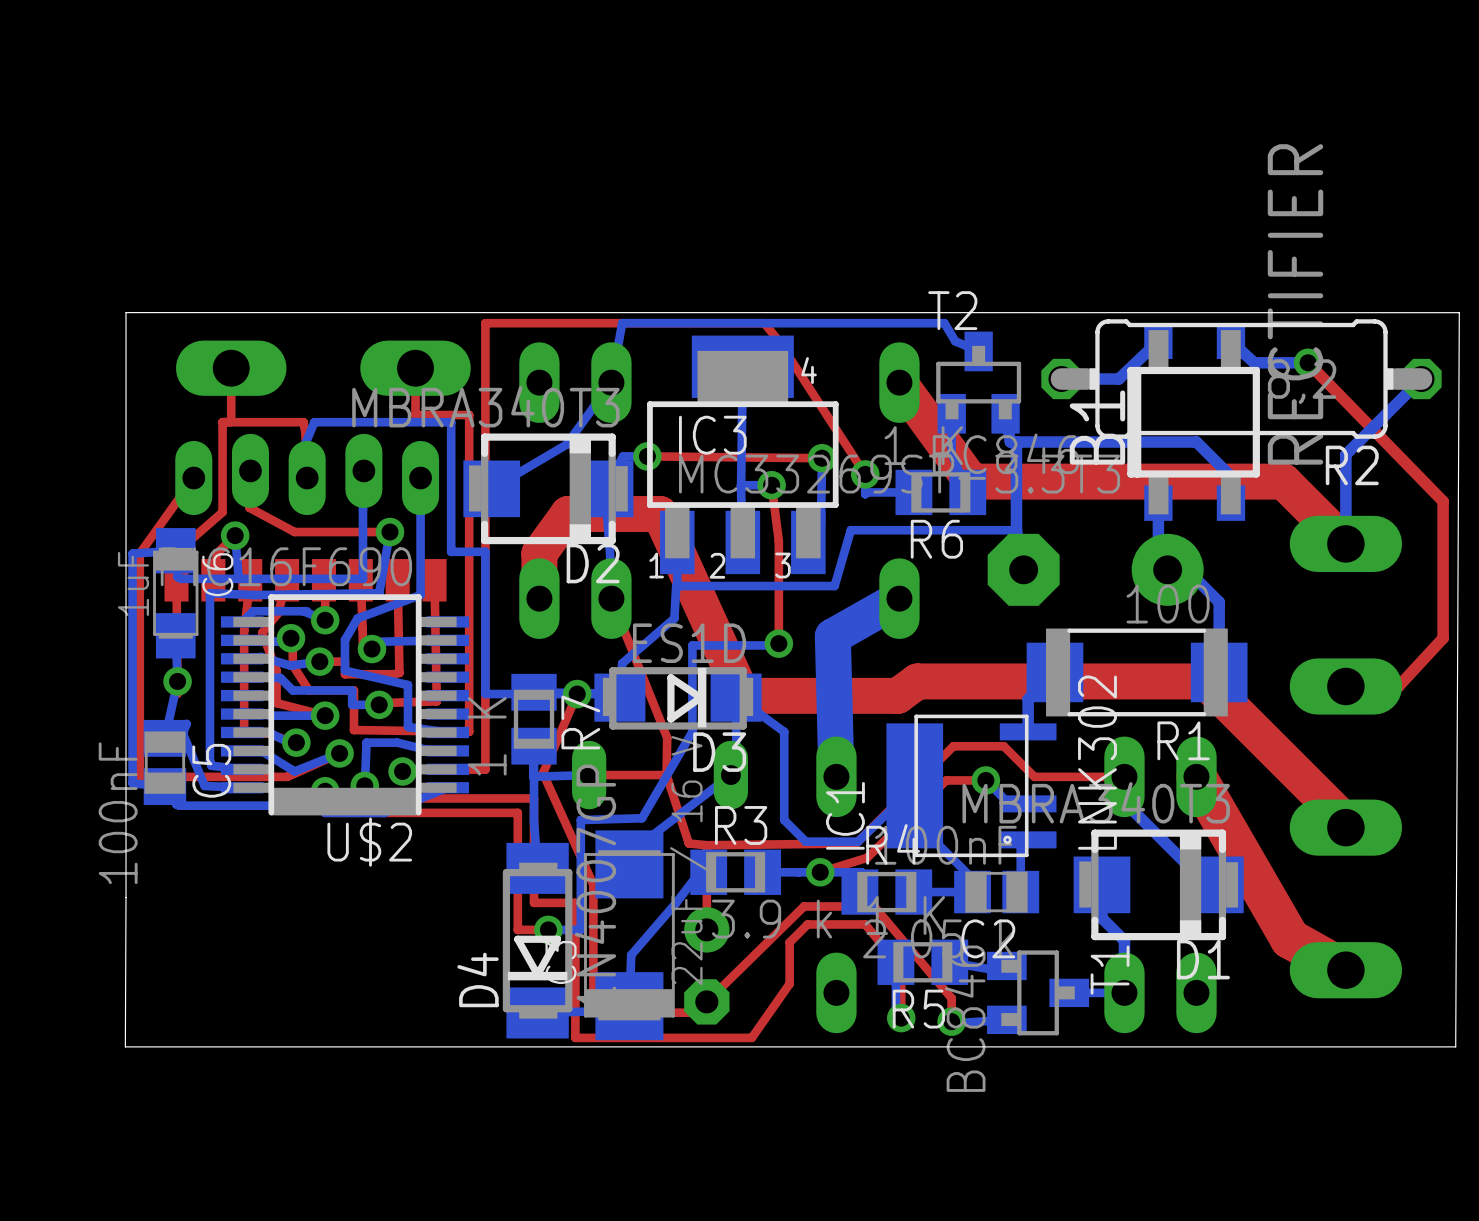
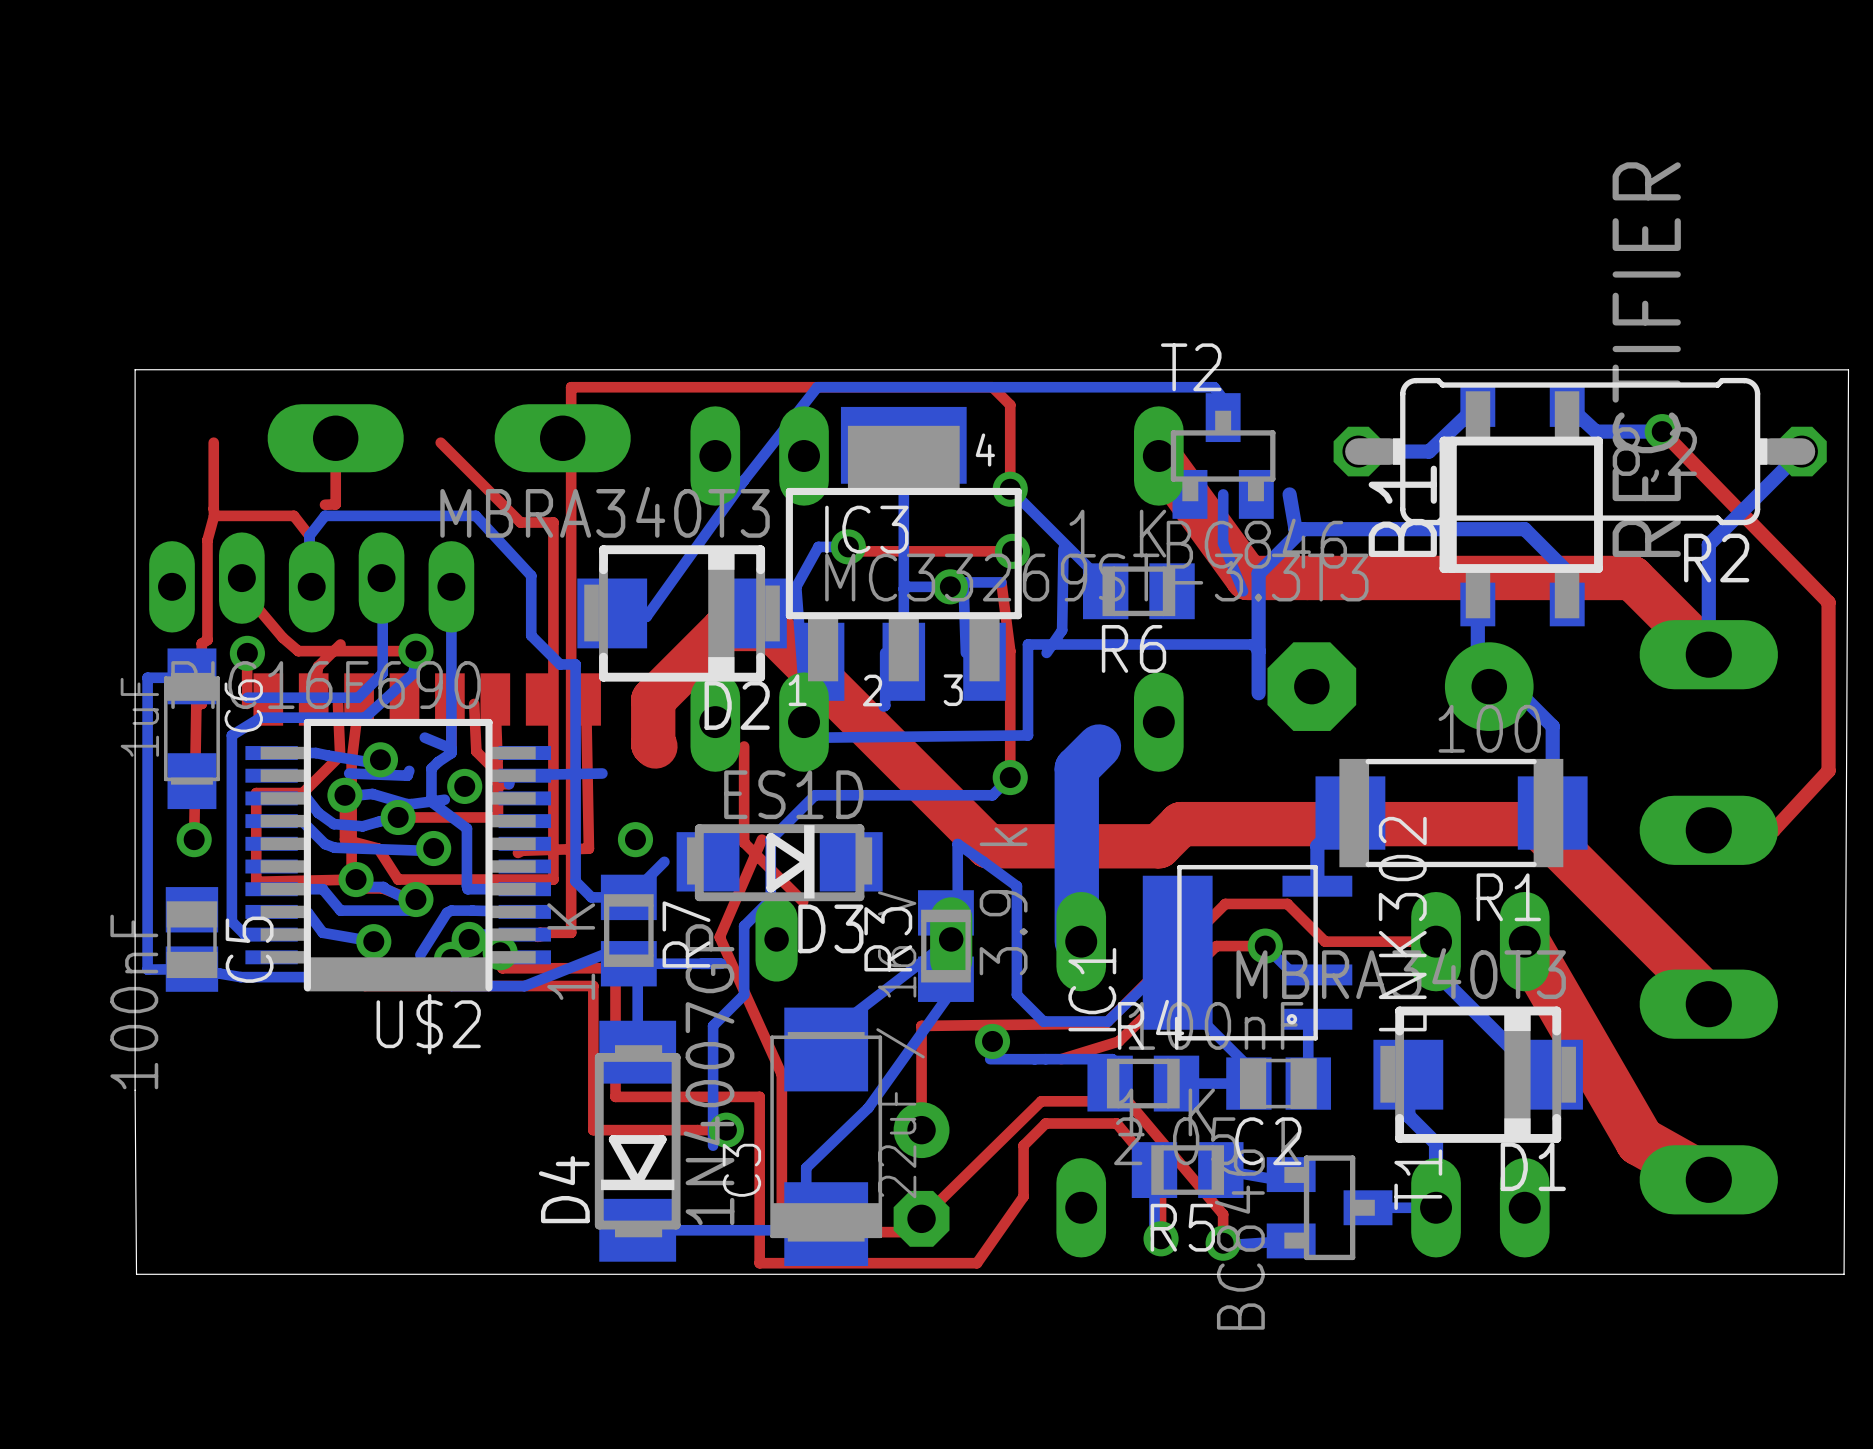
board edge: (126, 312) (125, 1046) -> (206, 369) (135, 369) (136, 1274) (205, 1274)
bottom track: none -> (1223, 417) (1227, 404) (1214, 387) (817, 387) (744, 480) (646, 616) (612, 613)
bottom track: (978, 351) (955, 341) (944, 323) (622, 323) (611, 382) (566, 444) (491, 488) -> none
bottom track: (742, 366) (741, 490) -> none
top track: (415, 368) (415, 415) (469, 415) (469, 731) (353, 730) (353, 690) (308, 690) (292, 665) (290, 638) -> none
top track: none -> (213, 442) (214, 515)
top track: none -> (440, 442) (520, 522) (553, 522) (553, 879) (398, 879) (378, 848) (344, 839) (344, 795)
bottom track: none -> (903, 445) (903, 661)
T2 position: (978, 382) -> (1223, 455)
bottom track: none -> (1010, 489) (1101, 580) (1101, 593) (1105, 591)
via: none -> (1010, 489)
top track: none -> (214, 515) (207, 540) (207, 640) (201, 643) (201, 703) (196, 703) (194, 839)
top track: none -> (214, 515) (293, 515) (309, 535) (309, 593) (311, 586)
bottom track: (1016, 442) (1016, 530) -> (1302, 529) (1258, 573) (1258, 693)
IC3 position: (742, 454) -> (903, 553)
top track: (647, 456) (822, 458) -> (848, 546) (852, 551) (1012, 551)
via: (822, 458) -> none
top track: (250, 470) (249, 507) (294, 532) (389, 532) -> none
bottom track: (363, 470) (362, 578) (249, 578) -> (381, 578) (382, 673) (358, 697)
part position: (307, 474) -> (311, 582)
bottom track: (865, 474) (865, 494) (867, 492) (913, 492) -> none
top track: (865, 474) (778, 341) (764, 323) (485, 323) (485, 769) (422, 769) -> (1010, 489) (1010, 404) (992, 387) (571, 387) (571, 932)
via: (865, 474) -> none
top track: (193, 478) (139, 553) (139, 776) (287, 776) (339, 753) -> none
bottom track: (307, 478) (305, 478) (305, 443) (314, 422) (451, 422) (451, 551) (485, 551) (485, 694) (636, 694) (534, 692) -> none
top track: (307, 478) (303, 422) (222, 422) (222, 512) (180, 549) (176, 580) (177, 693) (177, 681) -> none
bottom track: (420, 478) (420, 595) (357, 618) (344, 640) (344, 670) (407, 685) (407, 726) (447, 732) -> none
top track: none -> (241, 578) (240, 588) (282, 637) (298, 651) (415, 651)
via position: (771, 485) -> (1012, 551)
bottom track: none -> (311, 586) (309, 593) (309, 535) (325, 515) (475, 515) (531, 575) (531, 635) (560, 664) (575, 664) (575, 881) (591, 897) (628, 897) (664, 861)
bottom track: none -> (451, 586) (451, 753) (431, 768) (431, 801) (466, 828) (467, 889) (524, 889)
D2 position: (548, 488) -> (682, 613)
bottom track: none -> (950, 586) (908, 586) (903, 589)
via: none -> (950, 586)
R6 position: (940, 492) -> (1138, 591)
bottom track: (1016, 530) (850, 530) (834, 586) (676, 586) (674, 618) (622, 663) (619, 697) (629, 694) -> none
bottom track: (389, 532) (379, 593) (254, 595) (209, 593) (209, 760) (211, 765) (242, 769) -> none
via: (389, 532) -> none
bottom track: (235, 535) (238, 578) -> none
via: (235, 535) -> none
bottom track: none -> (415, 651) (413, 673) (364, 717) (260, 717) (231, 735) (231, 921) (244, 934) (271, 934)
via: none -> (415, 651)
bottom track: none -> (1258, 651) (1251, 644) (1027, 644) (1027, 735) (821, 737)
top track: none -> (247, 653) (247, 703)
via: none -> (247, 653)
bottom track: (181, 578) (177, 577) (175, 550) (132, 553) (132, 783) (164, 786) (176, 804) (179, 805) -> (191, 677) (147, 677) (147, 969) (191, 969) (240, 977) (271, 977)
bottom track: none -> (274, 697) (247, 697)
top track: (287, 580) (278, 613) (262, 632) (276, 670) (276, 703) (325, 715) -> none
top track: (397, 580) (399, 672) (344, 674) (344, 661) (319, 661) -> none
top track: none -> (337, 703) (340, 755) (302, 793) (256, 793) (256, 881) (356, 879)
top track: none -> (474, 703) (476, 751) (497, 773) (497, 817) (398, 817)
C6 position: (175, 593) -> (191, 728)
top track: (539, 598) (539, 553) (568, 514) (660, 514) (742, 695) (897, 695) (917, 681) -> (655, 746) (653, 744) (653, 699) (724, 628) (770, 628) (988, 846) (1158, 846) (1181, 824)
top track: (611, 598) (667, 737) (666, 775) -> none
bottom track: (899, 598) (832, 636) (836, 776) -> none
bottom track: (307, 611) (253, 611) (242, 622) -> none
top track: none -> (744, 746) (744, 842) (803, 901)
bottom track: none -> (1098, 746) (1076, 768) (1076, 941)
via: (325, 620) -> none
bottom track: none -> (271, 753) (316, 753) (367, 761) (380, 766) (380, 759)
bottom track: (175, 635) (177, 681) (164, 738) (186, 723) (182, 733) (204, 785) (242, 787) -> none
via position: (290, 638) -> (380, 759)
bottom track: (778, 643) (773, 645) (692, 645) (692, 731) (642, 818) (580, 820) (580, 929) (548, 929) -> (1010, 777) (992, 795) (815, 795) (770, 839) (770, 899) (744, 926) (744, 994) (713, 1025) (713, 1145)
via: (371, 649) -> none
via: none -> (344, 795)
bottom track: none -> (271, 798) (306, 797) (318, 813) (333, 824) (362, 826) (398, 817)
via position: (319, 661) -> (464, 786)
via: none -> (398, 817)
bottom track: (242, 677) (280, 677) (292, 690) (352, 690) (352, 704) (379, 704) -> none
bottom track: none -> (271, 821) (302, 821) (325, 844) (334, 847) (422, 850) (433, 848)
via: (177, 681) -> none
via: none -> (194, 839)
via: none -> (635, 839)
via: (577, 694) -> none
D3 position: (678, 698) -> (779, 862)
U$2 position: (344, 704) -> (398, 855)
via: (379, 704) -> none
bottom track: (242, 714) (242, 712) (271, 715) (325, 715) -> none
via position: (325, 715) -> (433, 848)
R7 position: (534, 719) -> (628, 930)
via: none -> (356, 879)
bottom track: none -> (271, 889) (322, 889) (340, 910) (411, 910)
bottom track: (242, 750) (262, 751) (294, 771) (339, 753) -> none
bottom track: (447, 750) (426, 749) (397, 742) (366, 742) (364, 785) -> none
bottom track: none -> (271, 911) (307, 912) (322, 932) (373, 941)
bottom track: none -> (524, 911) (451, 910) (446, 912) (420, 954)
via position: (339, 753) -> (469, 939)
C5 position: (164, 762) -> (191, 939)
via: (402, 771) -> none
bottom track: (589, 775) (533, 776) (534, 746) (534, 821) (537, 868) -> none
top track: (666, 775) (688, 843) (706, 845) -> none
top track: (666, 775) (589, 775) -> none
via: none -> (373, 941)
bottom track: none -> (701, 963) (721, 963) (628, 963) (637, 965) (637, 1052)
top track: (458, 798) (534, 798) (534, 902) -> (615, 968) (615, 1096) (708, 1096)
bottom track: none -> (945, 979) (957, 983) (868, 1107) (806, 1167) (806, 1217) (793, 1230) (637, 1230)
top track: (440, 812) (517, 812) (517, 929) -> (593, 986) (593, 1130) (688, 1130)
R3 name position: R3 (741, 825) -> R3 (888, 939)
bottom track: (708, 872) (699, 872) (631, 955) (629, 1006) (602, 1011) (537, 1012) -> none
R3 rotation: 0° (735, 872) -> 90° clockwise (945, 946)
R3 position: (735, 872) -> (945, 946)
via position: (820, 872) -> (992, 1041)
R3 value position: 3.9 k (771, 919) -> 3.9 k (1003, 901)
D4 position: (537, 940) -> (637, 1141)

